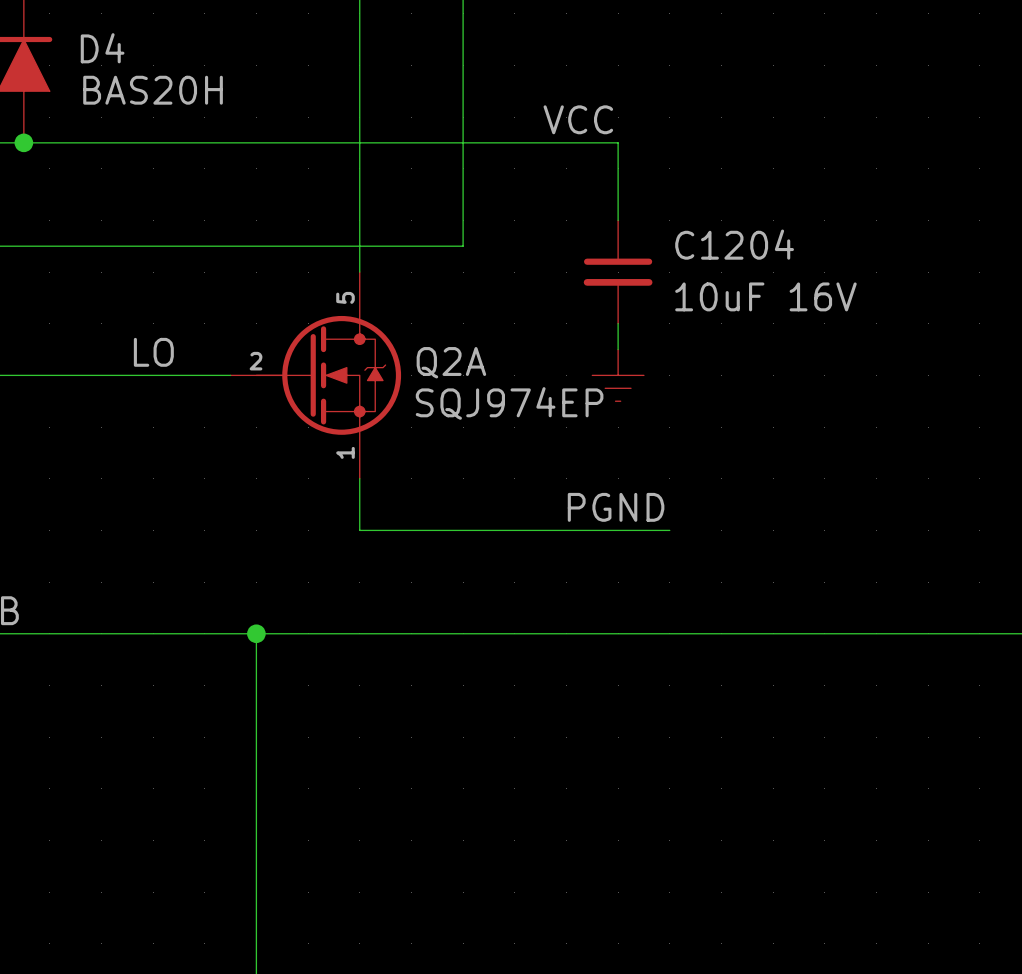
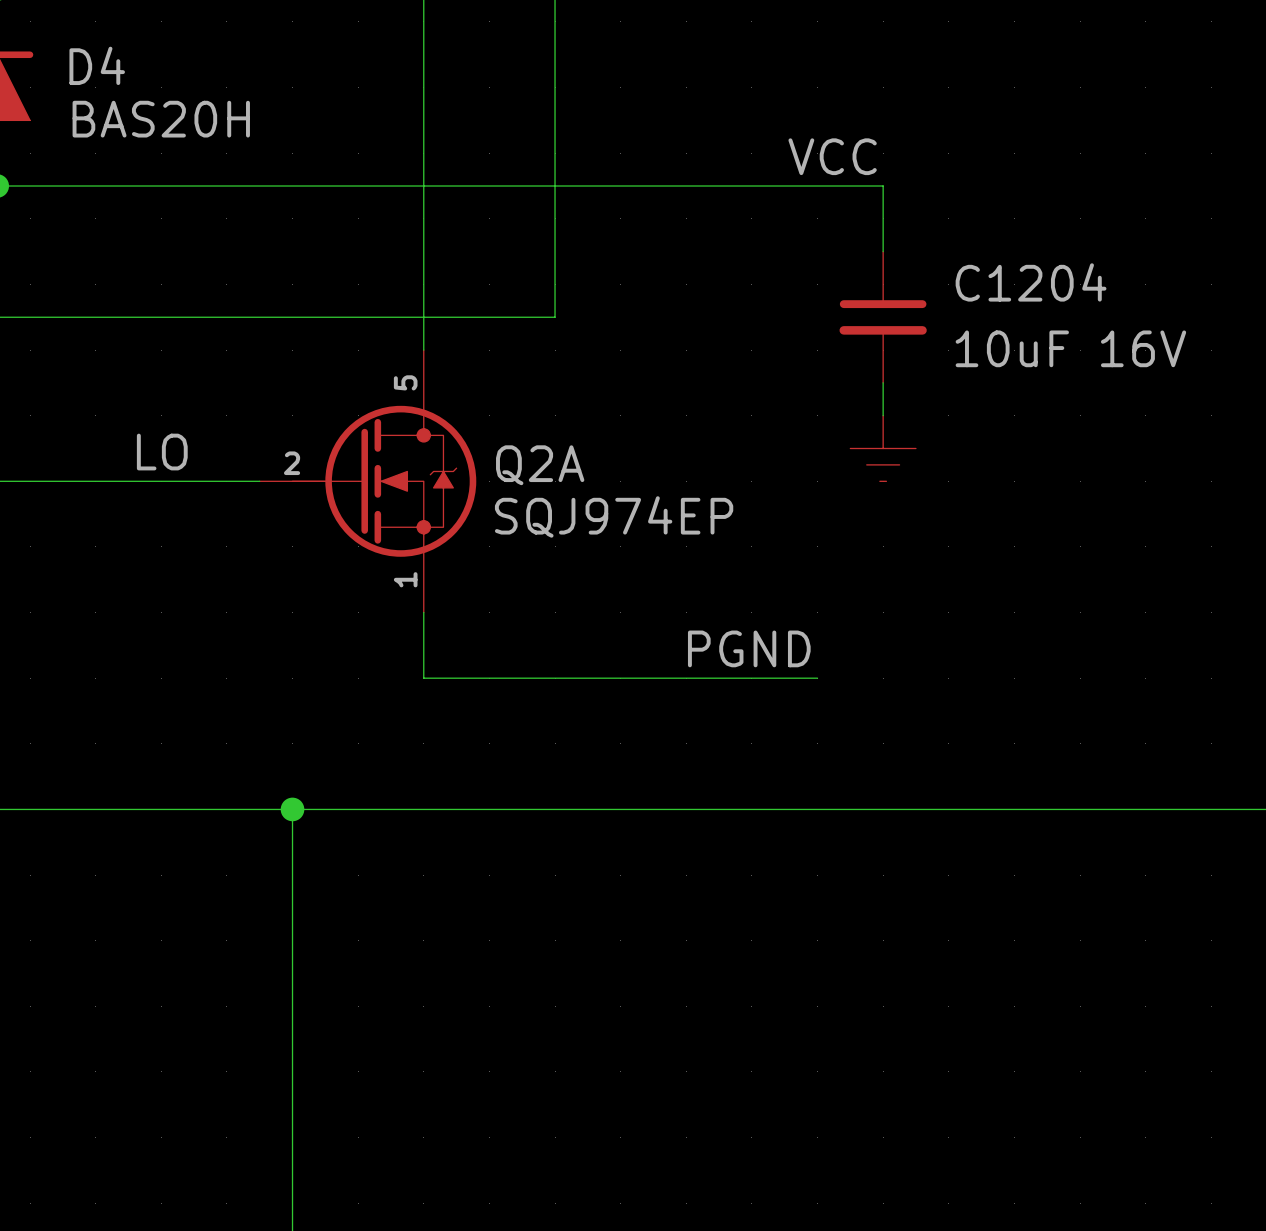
label position: VCC (578, 119) -> VCC (832, 156)
wire: (618, 142) (618, 220) -> (751, 186) (883, 186) (883, 251)
C1204 position: (618, 272) -> (883, 317)
wire: (618, 323) (618, 349) -> (883, 382) (883, 415)
power symbol position: (618, 375) -> (883, 448)

